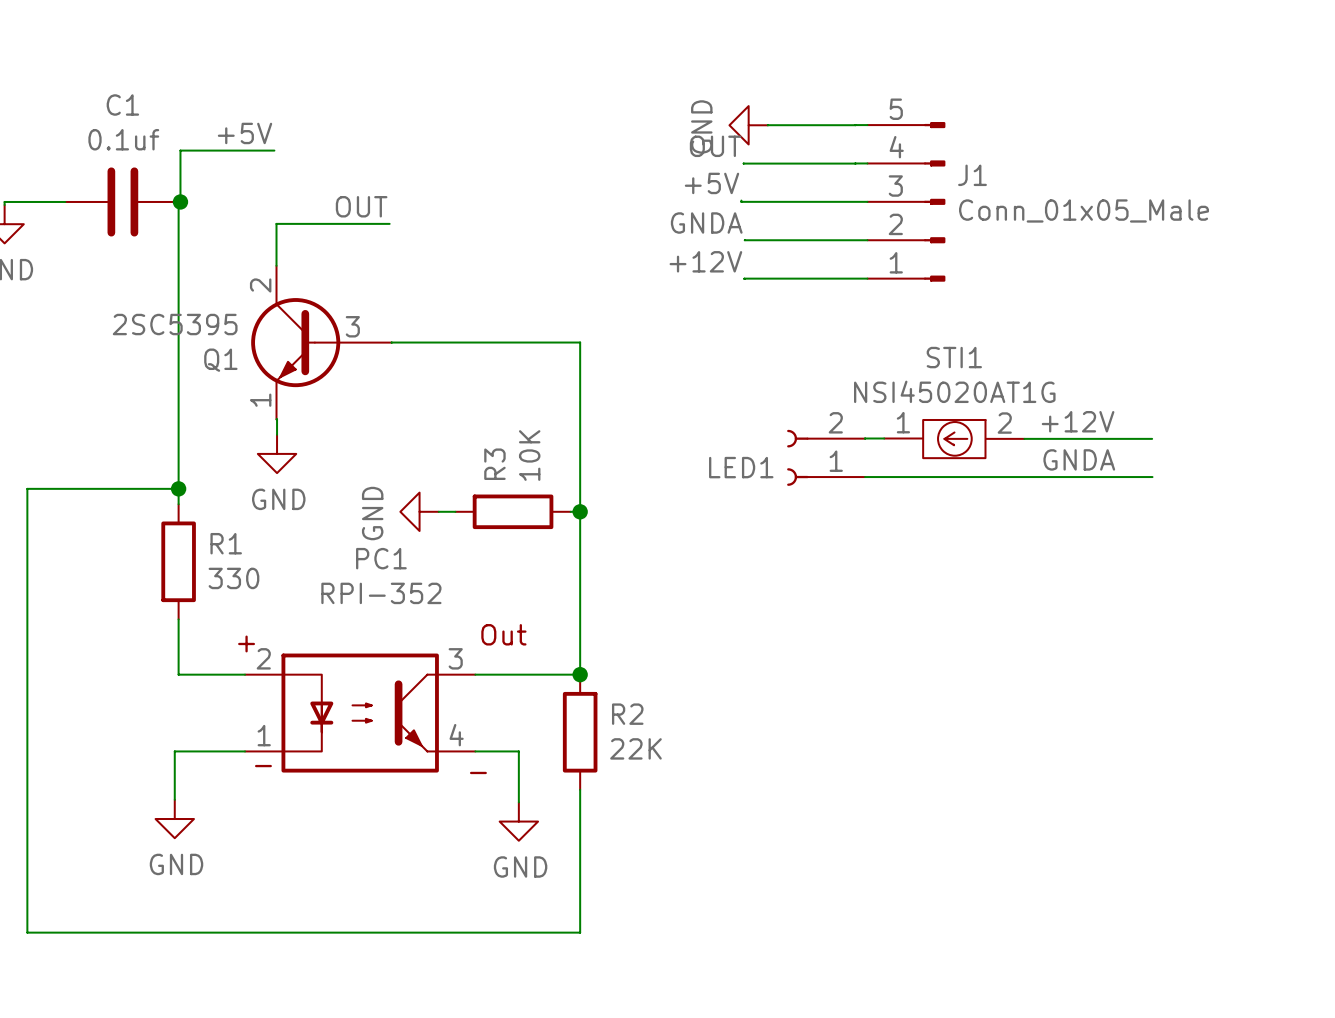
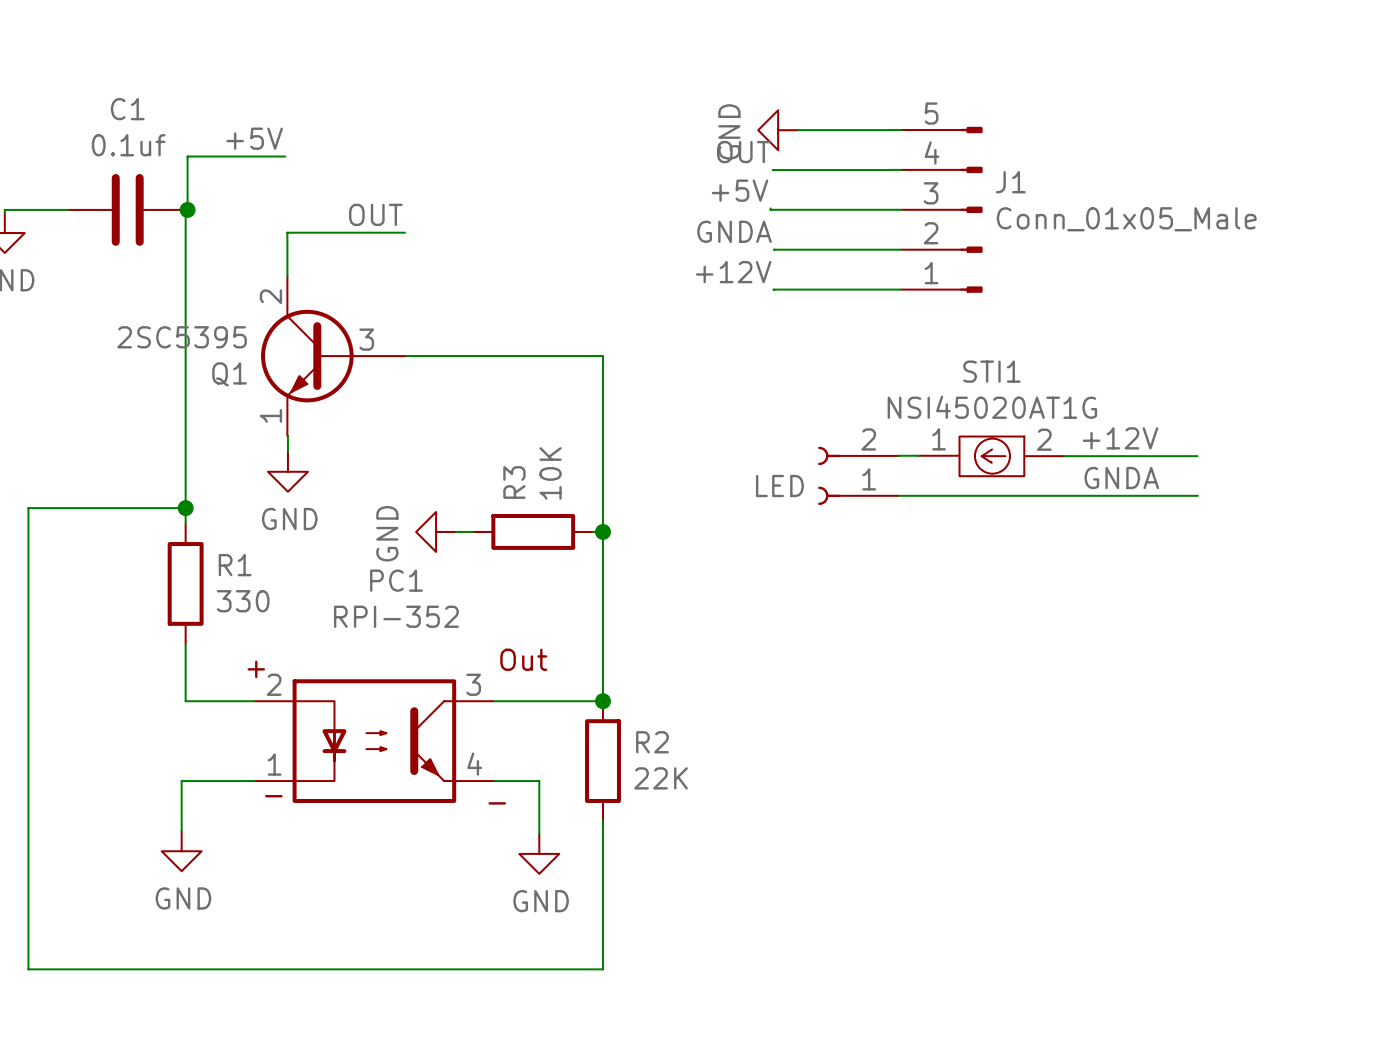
LED1 name: LED1 (741, 467) -> LED (779, 486)

